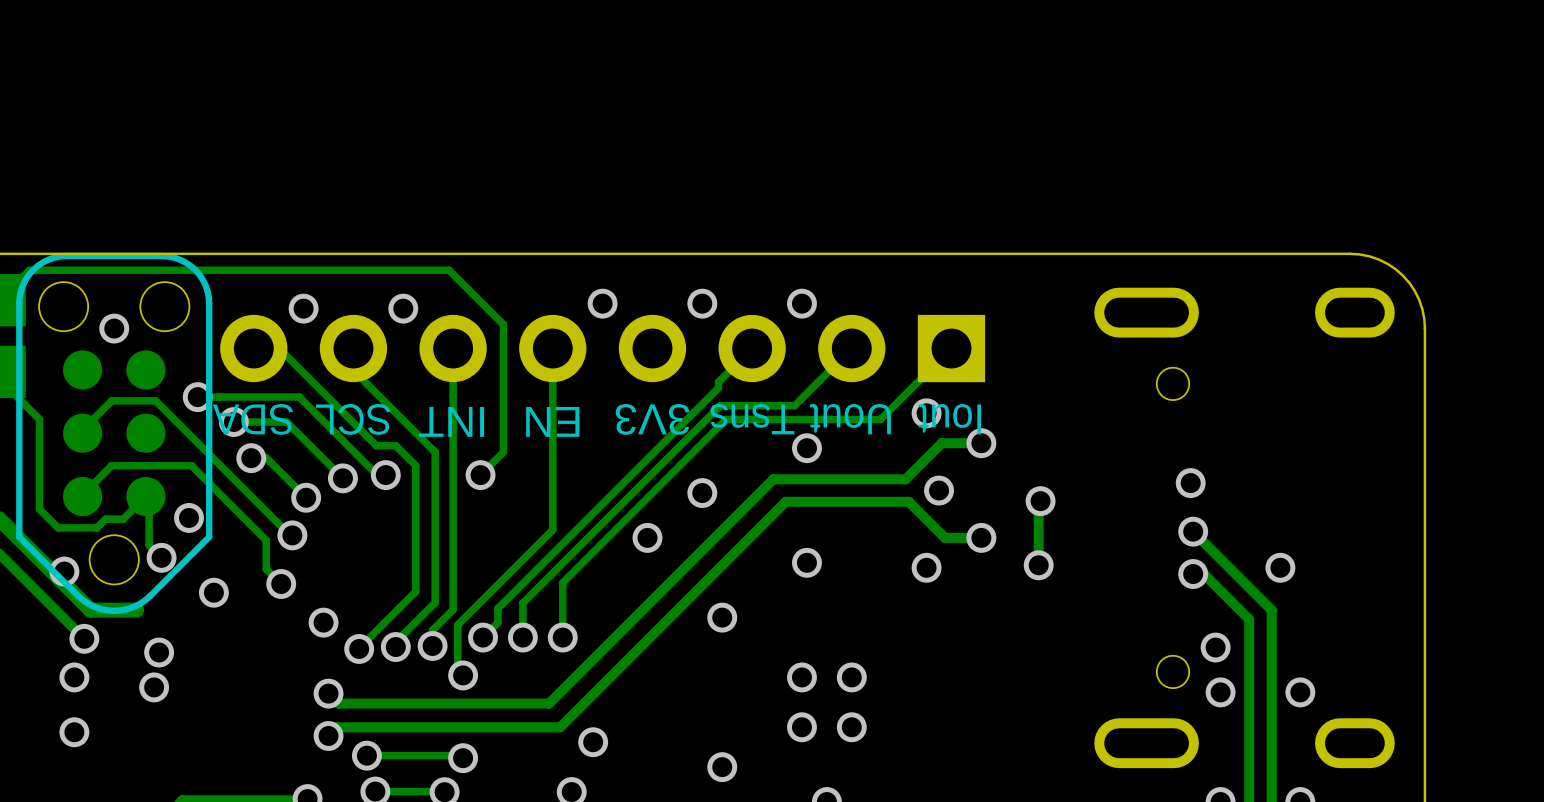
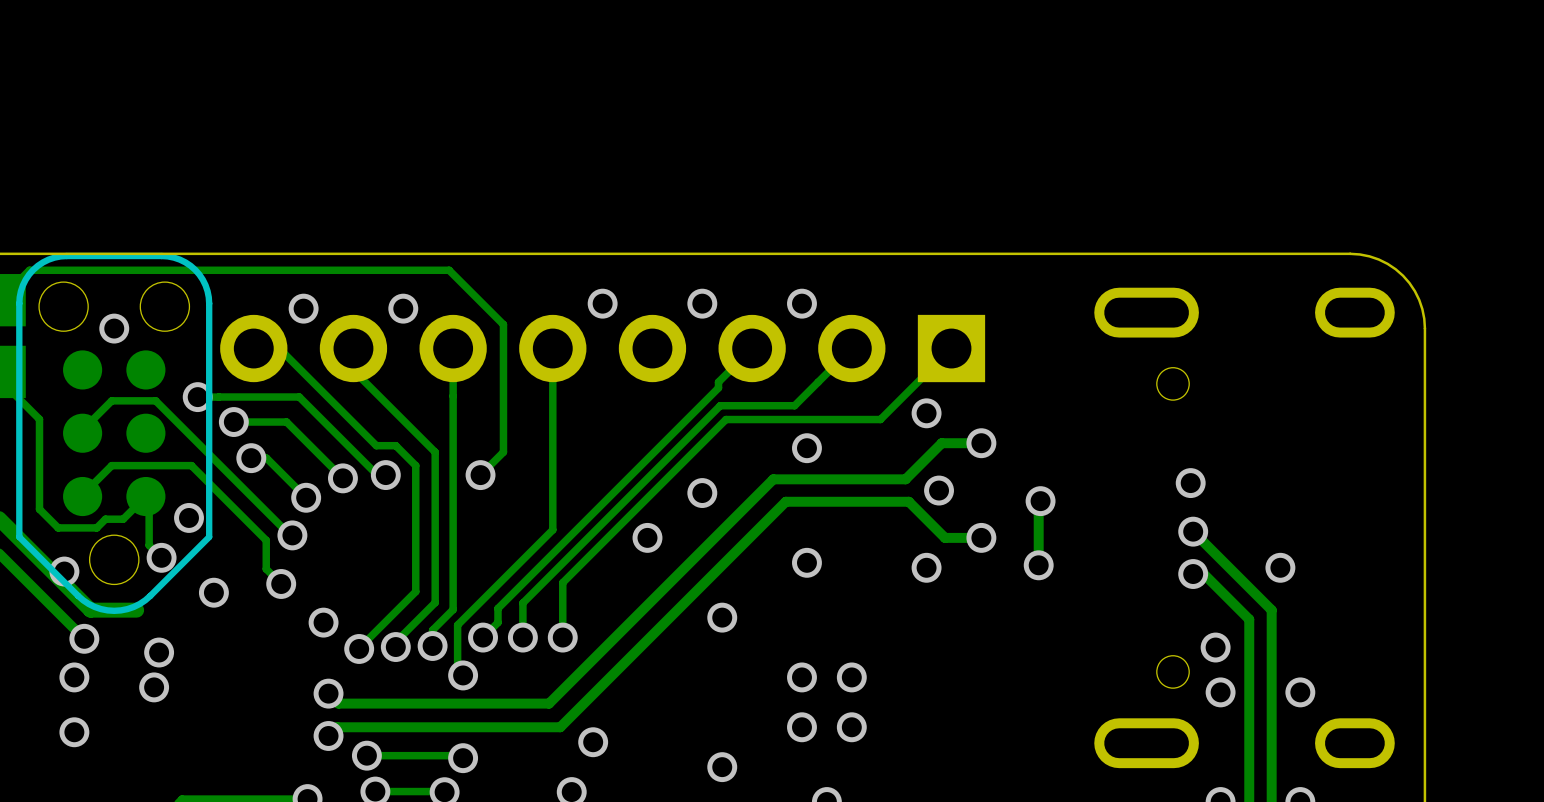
text: SDA (252, 419) -> none
text: SCL (353, 419) -> none
text: 3V3 (652, 419) -> none
text: Tsns (752, 419) -> none
text: Uout (850, 419) -> none
text: Iout (949, 419) -> none
text: INT (451, 421) -> none
text: EN (552, 421) -> none

